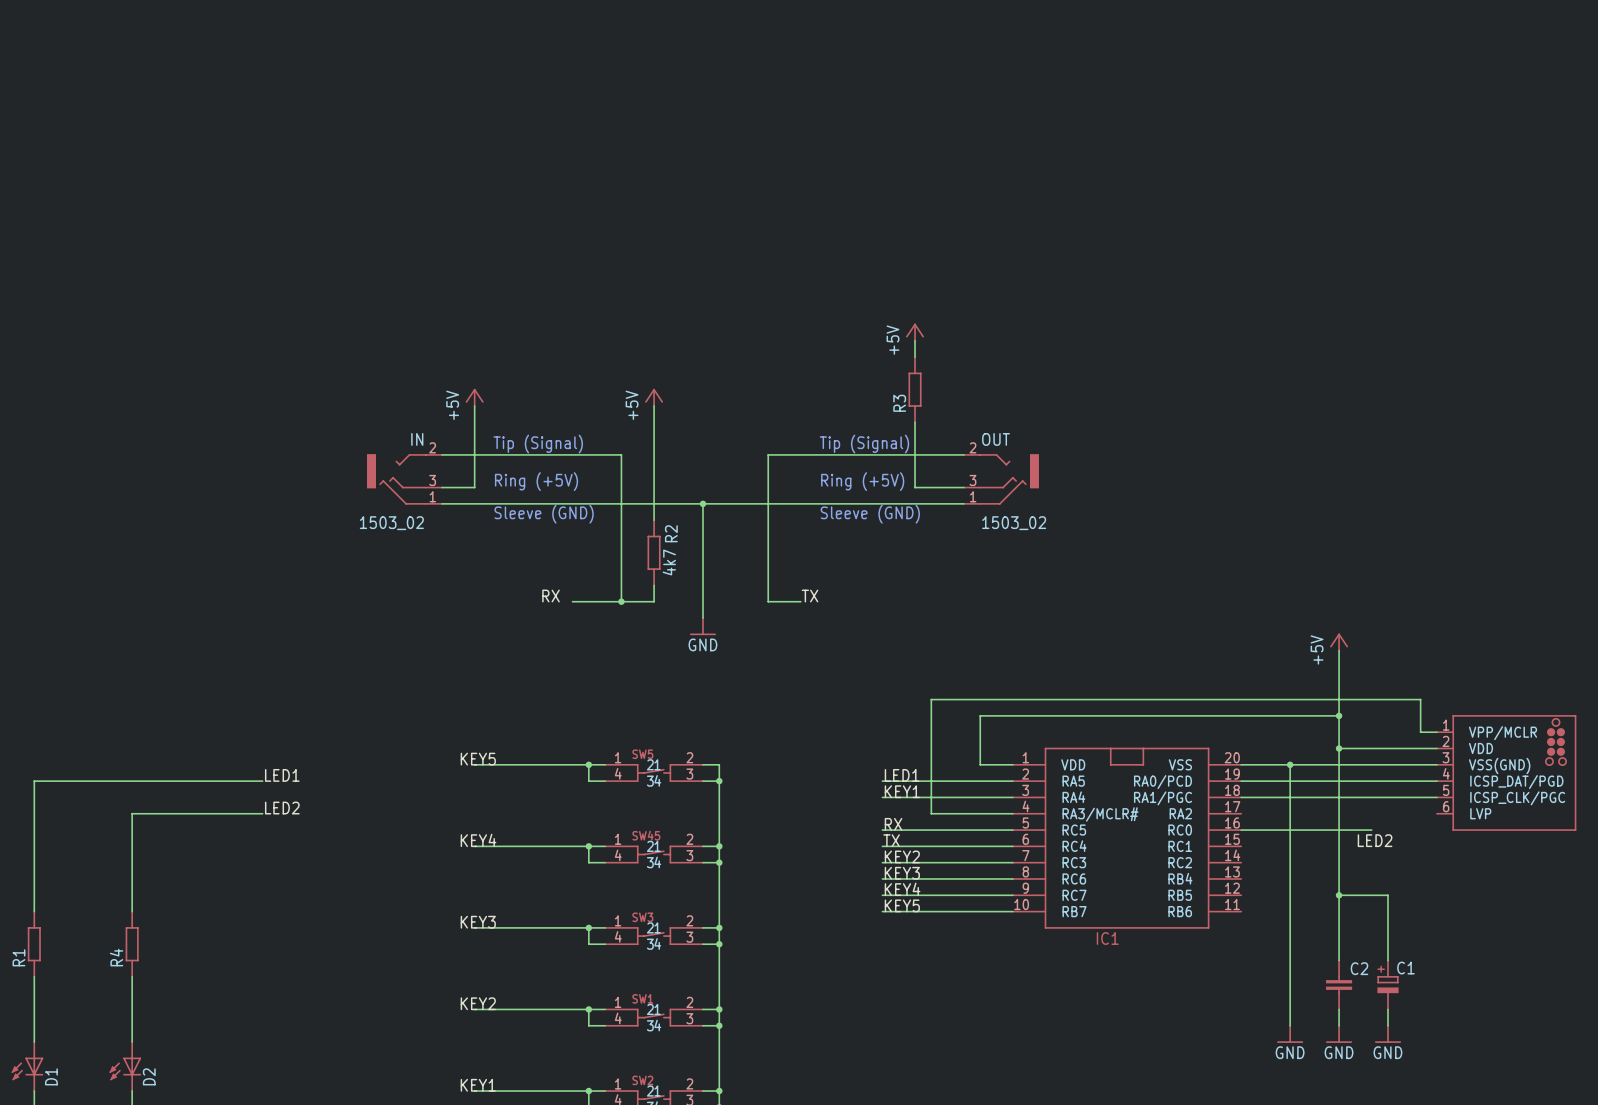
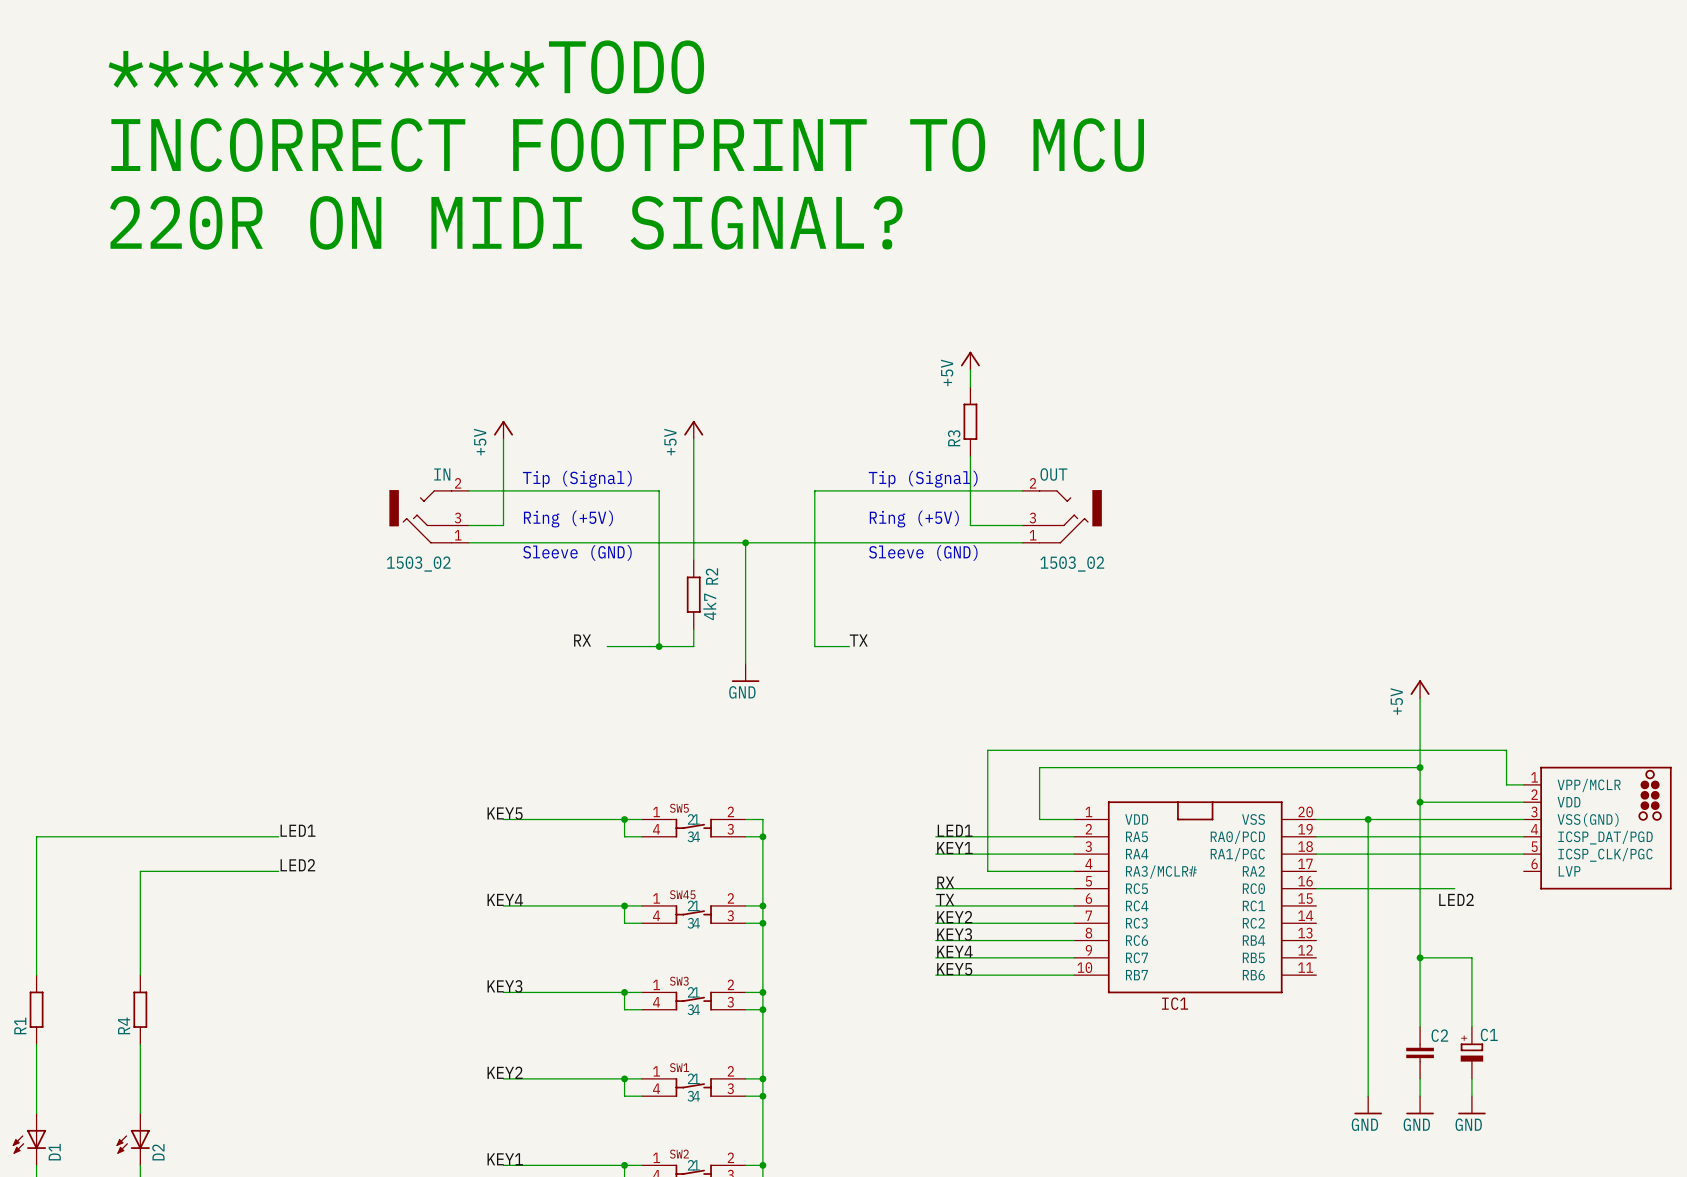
text: none -> ***********TODO (406, 67)
text: none -> INCORRECT FOOTPRINT TO MCU (627, 145)
text: none -> 220R ON MIDI SIGNAL? (506, 222)

